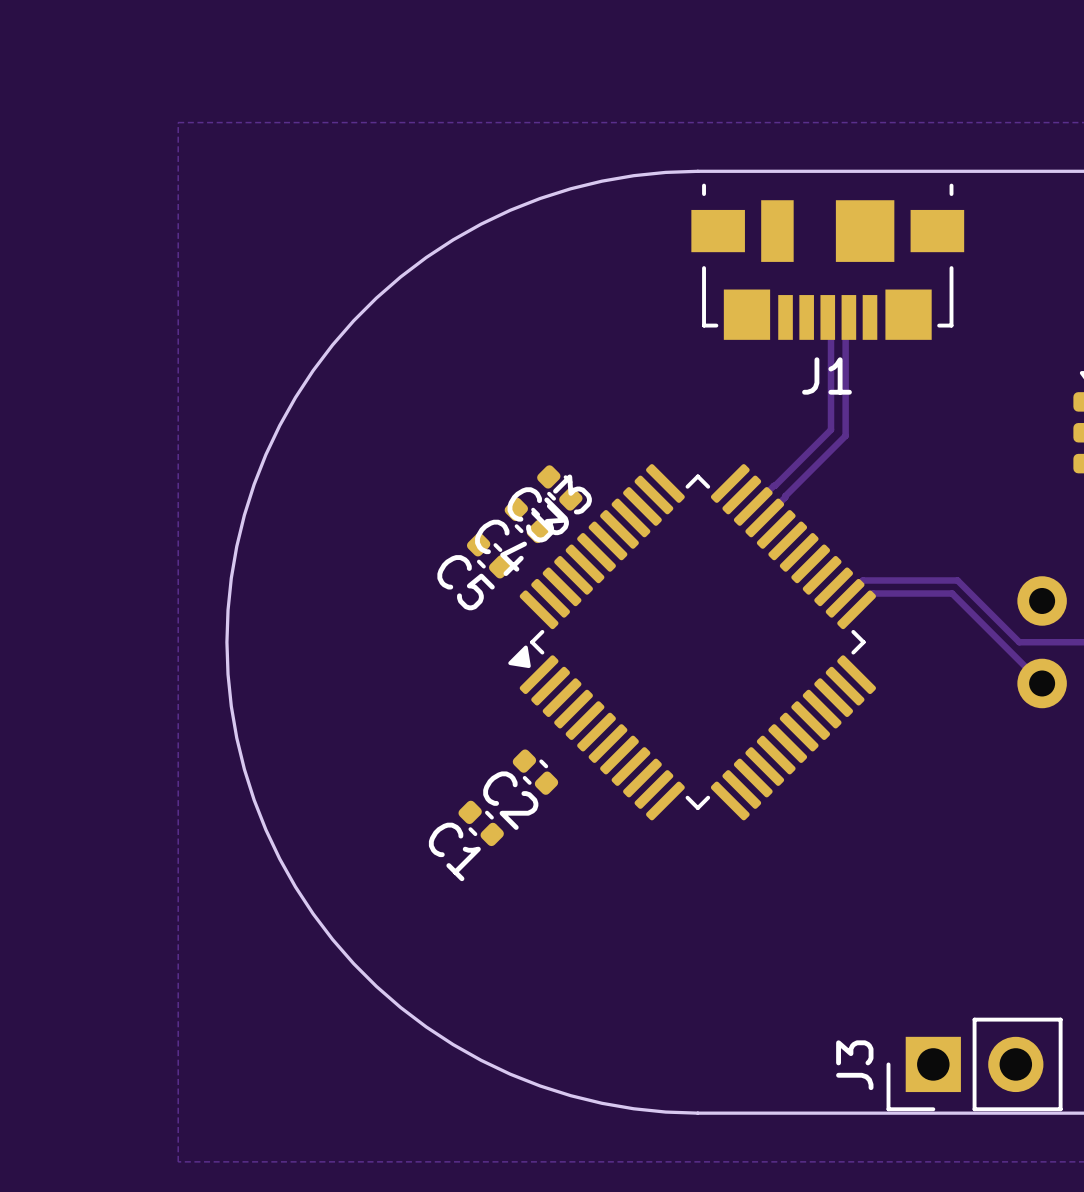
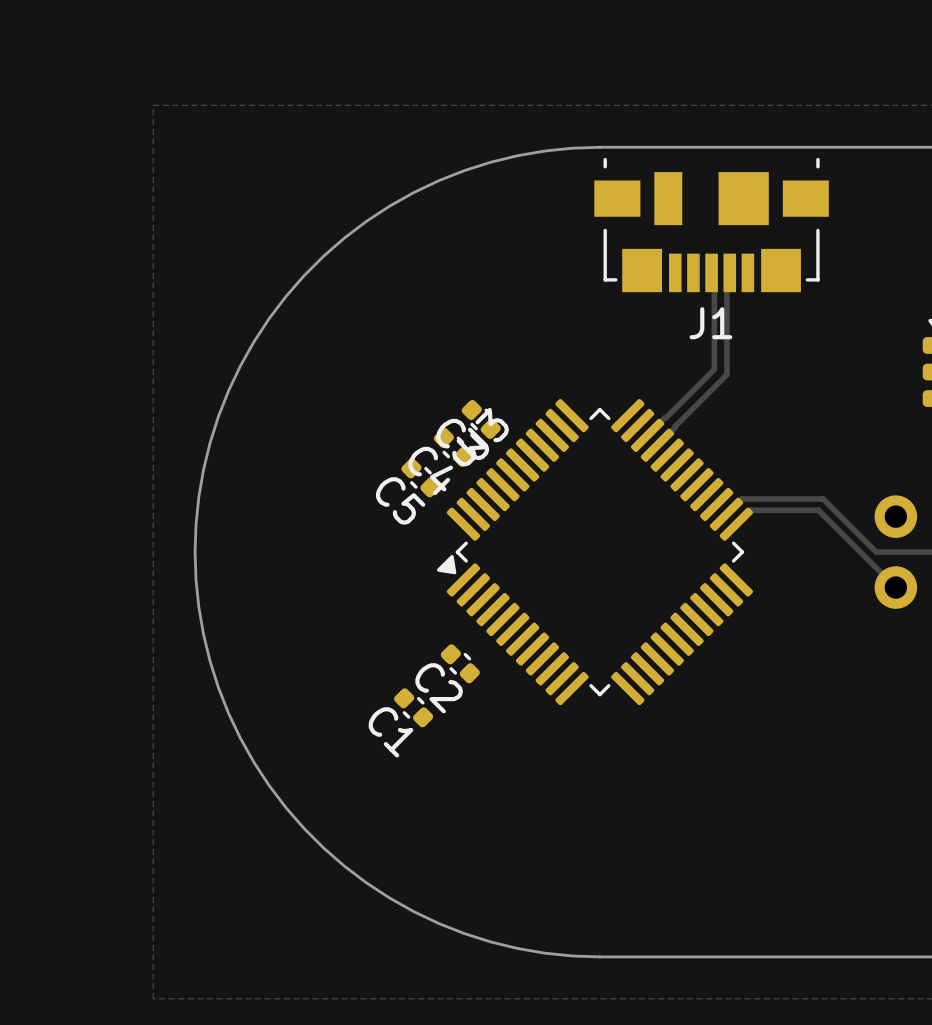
J3: (974, 1064) -> none

